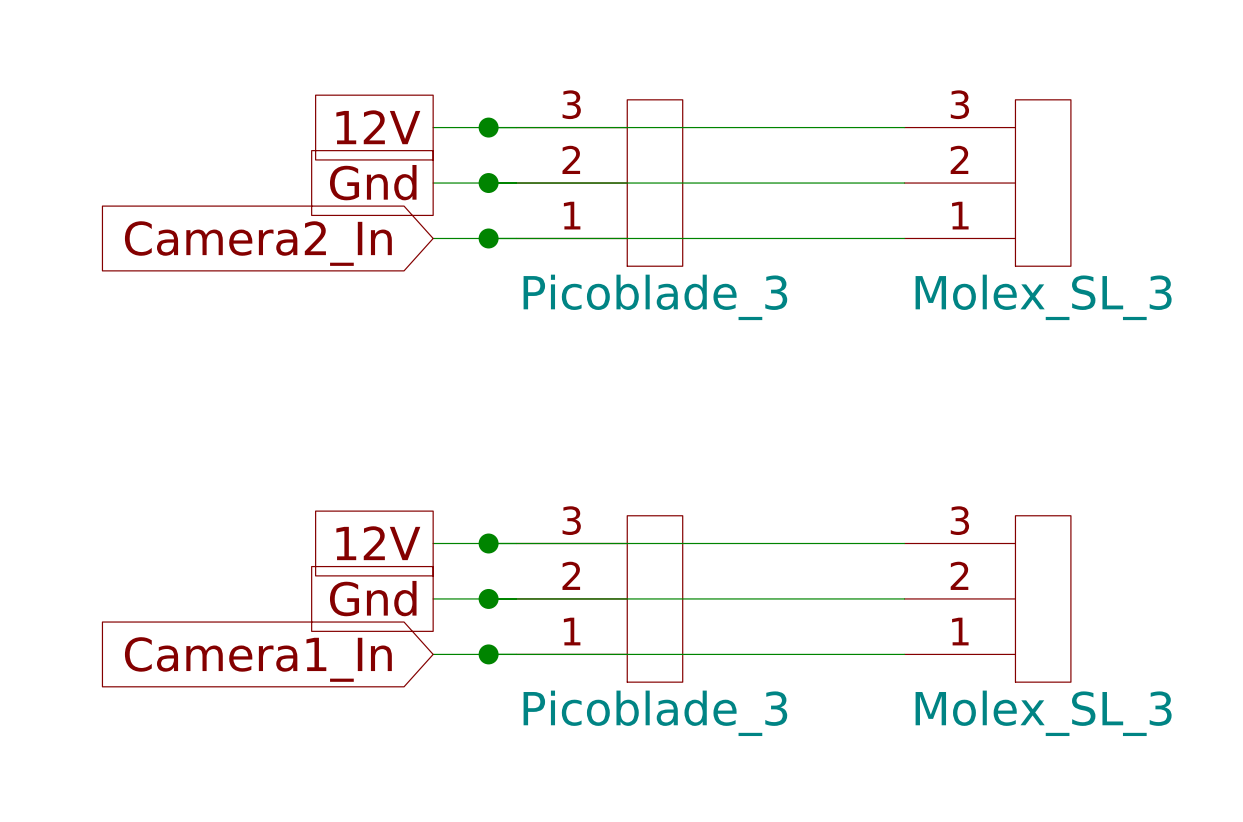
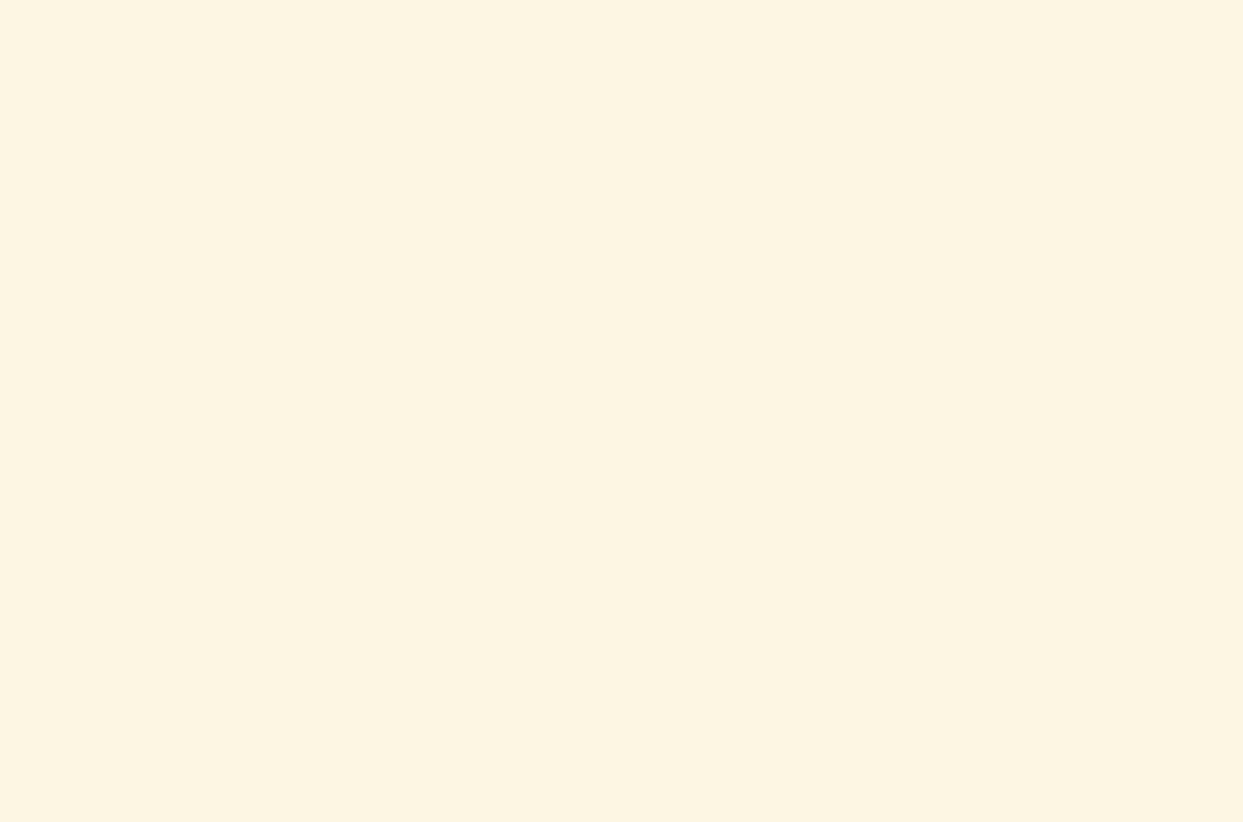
global label: 12V (378, 127) -> none
wire: (433, 127) (904, 127) -> none
junction: (488, 127) -> none
global label: Gnd (373, 182) -> none
wire: (433, 183) (904, 183) -> none
junction: (488, 183) -> none
part: Picoblade_3 (599, 183) -> none
part: Molex_SL_3 (987, 183) -> none
wire: (433, 238) (904, 238) -> none
junction: (488, 238) -> none
global label: Camera2_In (258, 243) -> none
global label: 12V (378, 543) -> none
wire: (433, 543) (904, 543) -> none
junction: (488, 543) -> none
global label: Gnd (373, 598) -> none
wire: (433, 598) (904, 598) -> none
junction: (488, 598) -> none
part: Picoblade_3 (599, 598) -> none
part: Molex_SL_3 (987, 598) -> none
wire: (433, 654) (904, 654) -> none
junction: (488, 654) -> none
global label: Camera1_In (258, 659) -> none

